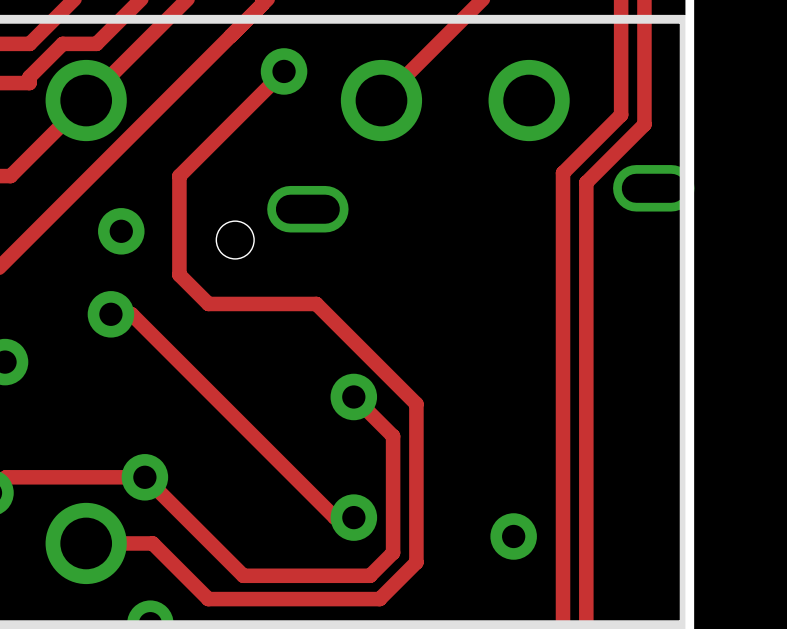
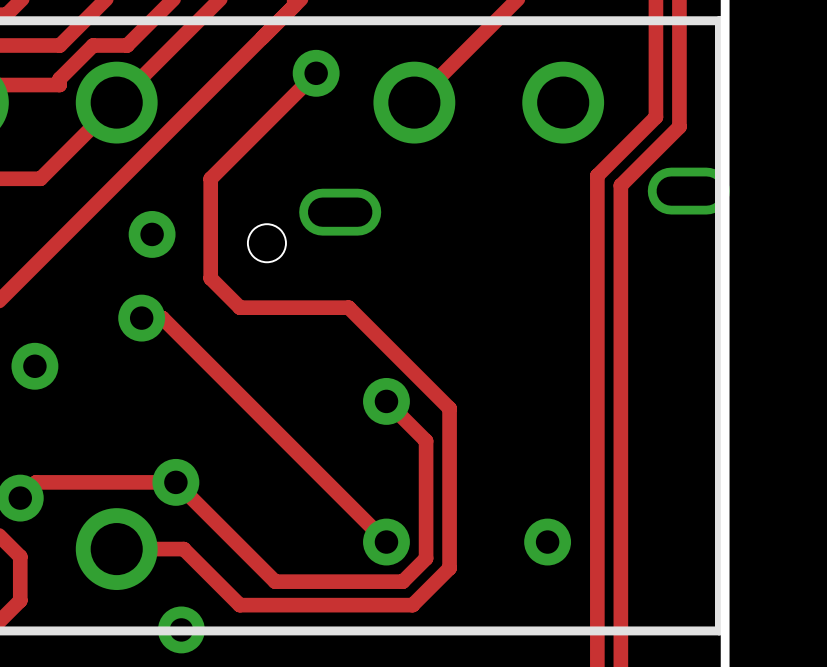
via position: (353, 517) -> (386, 542)

